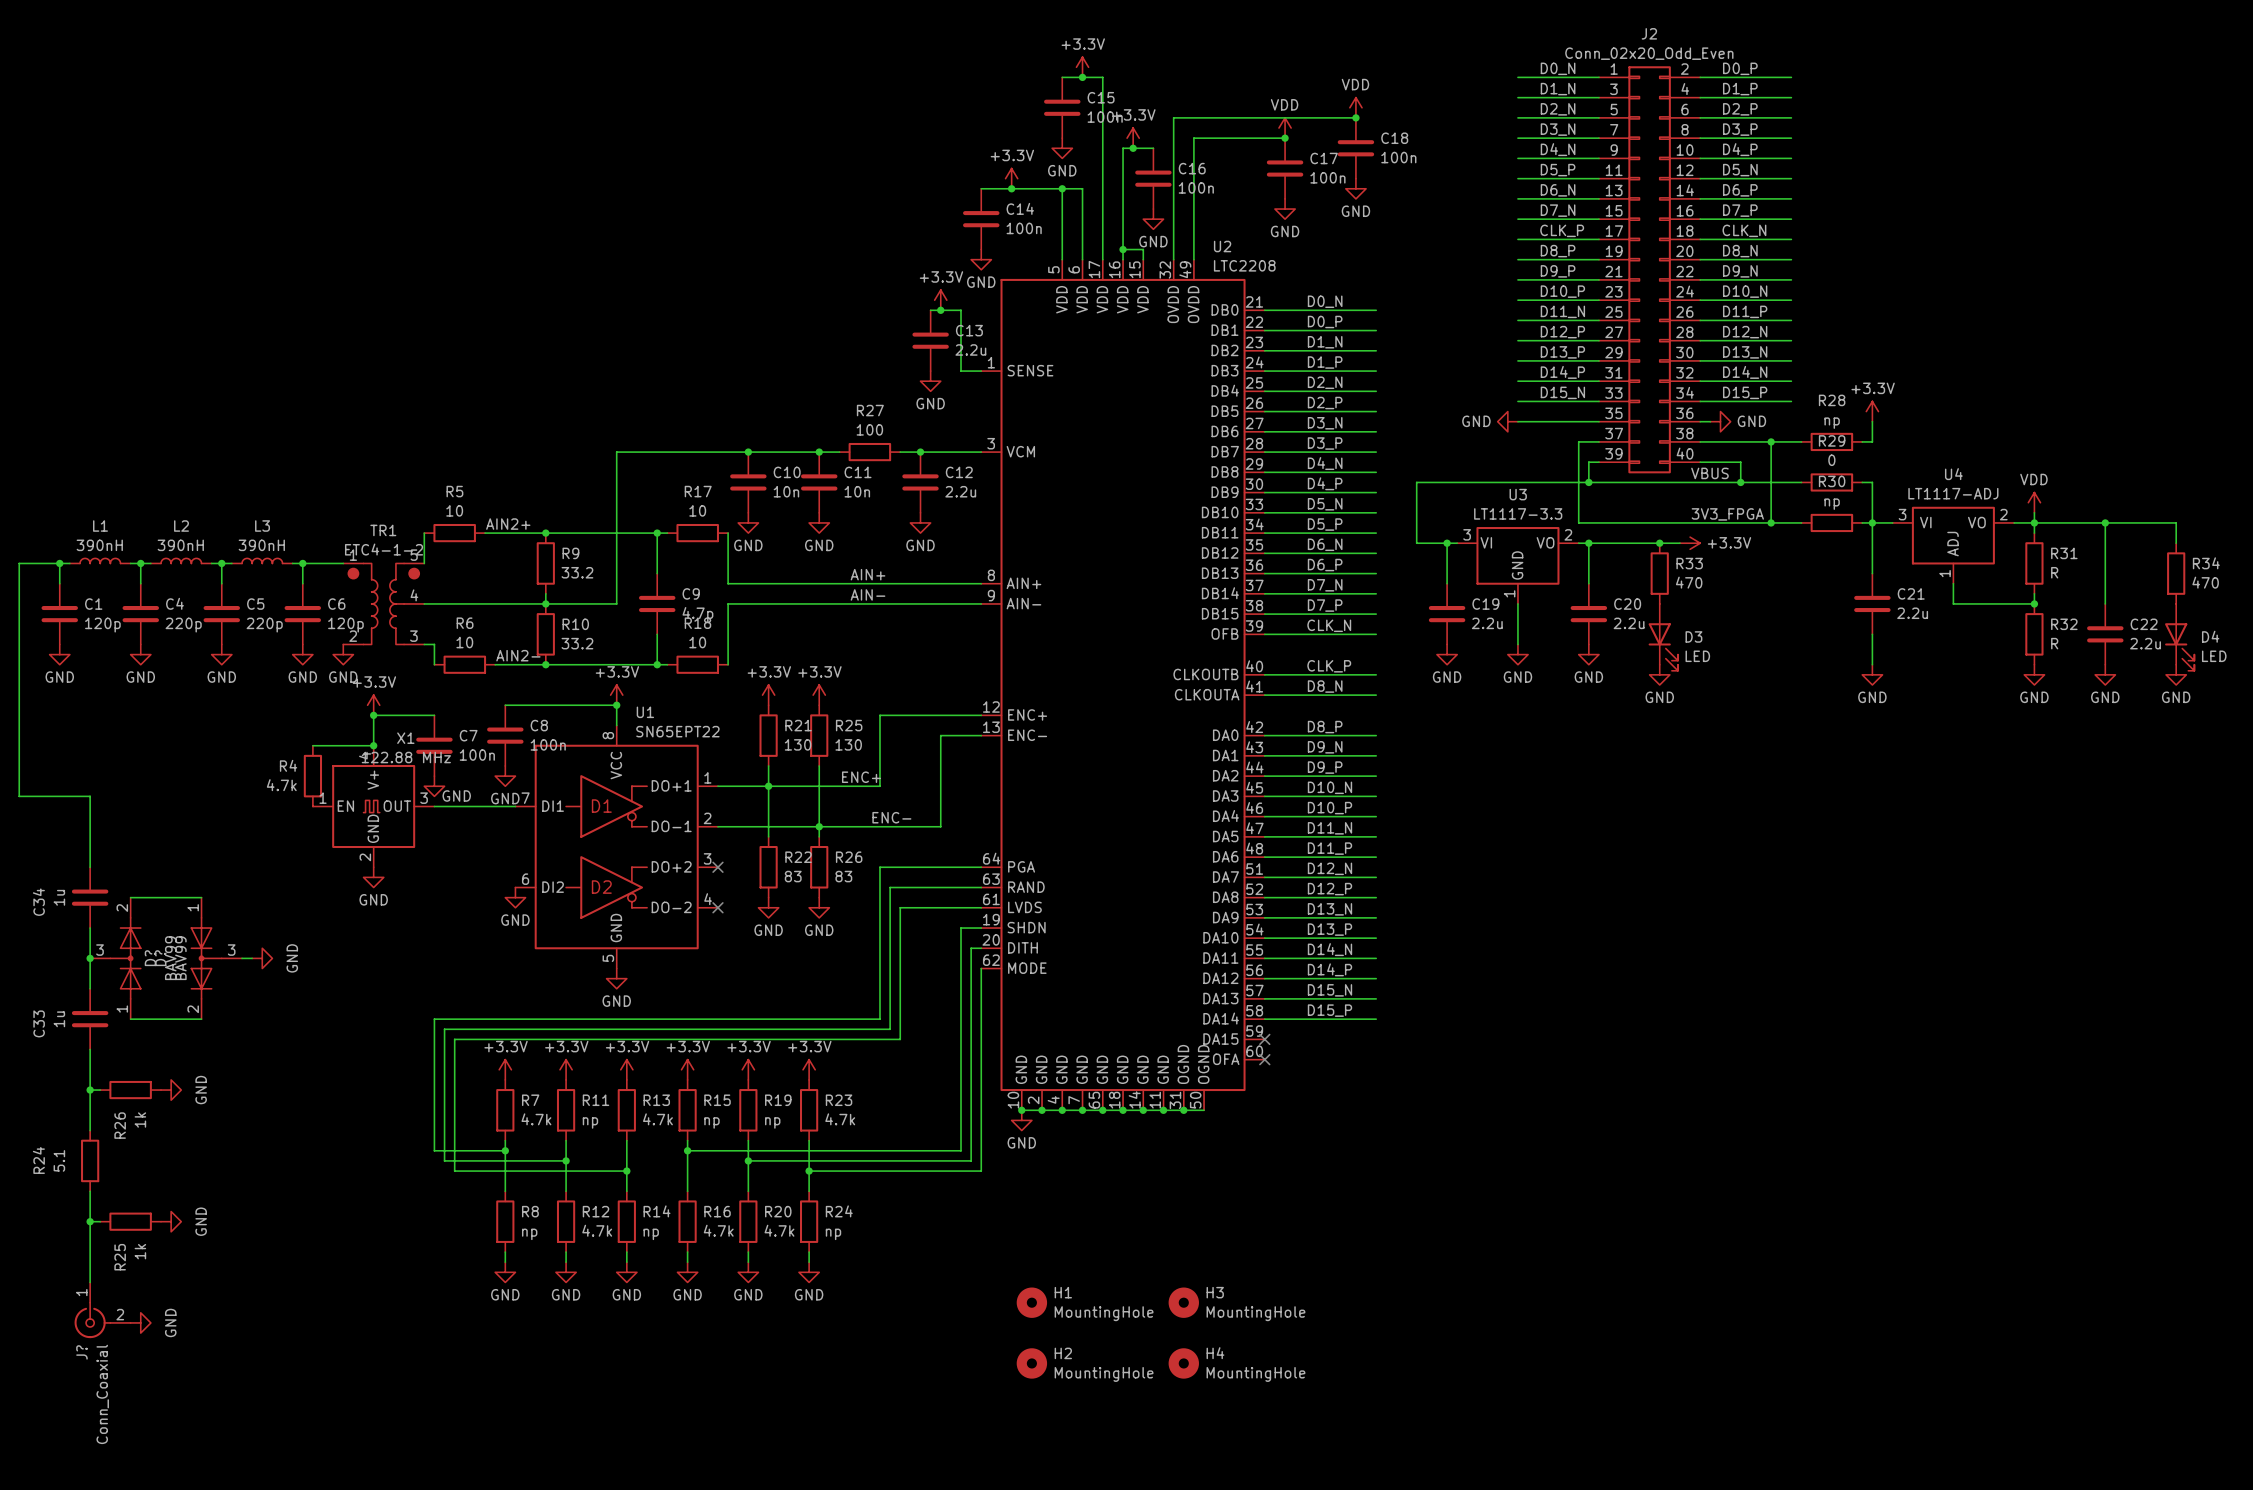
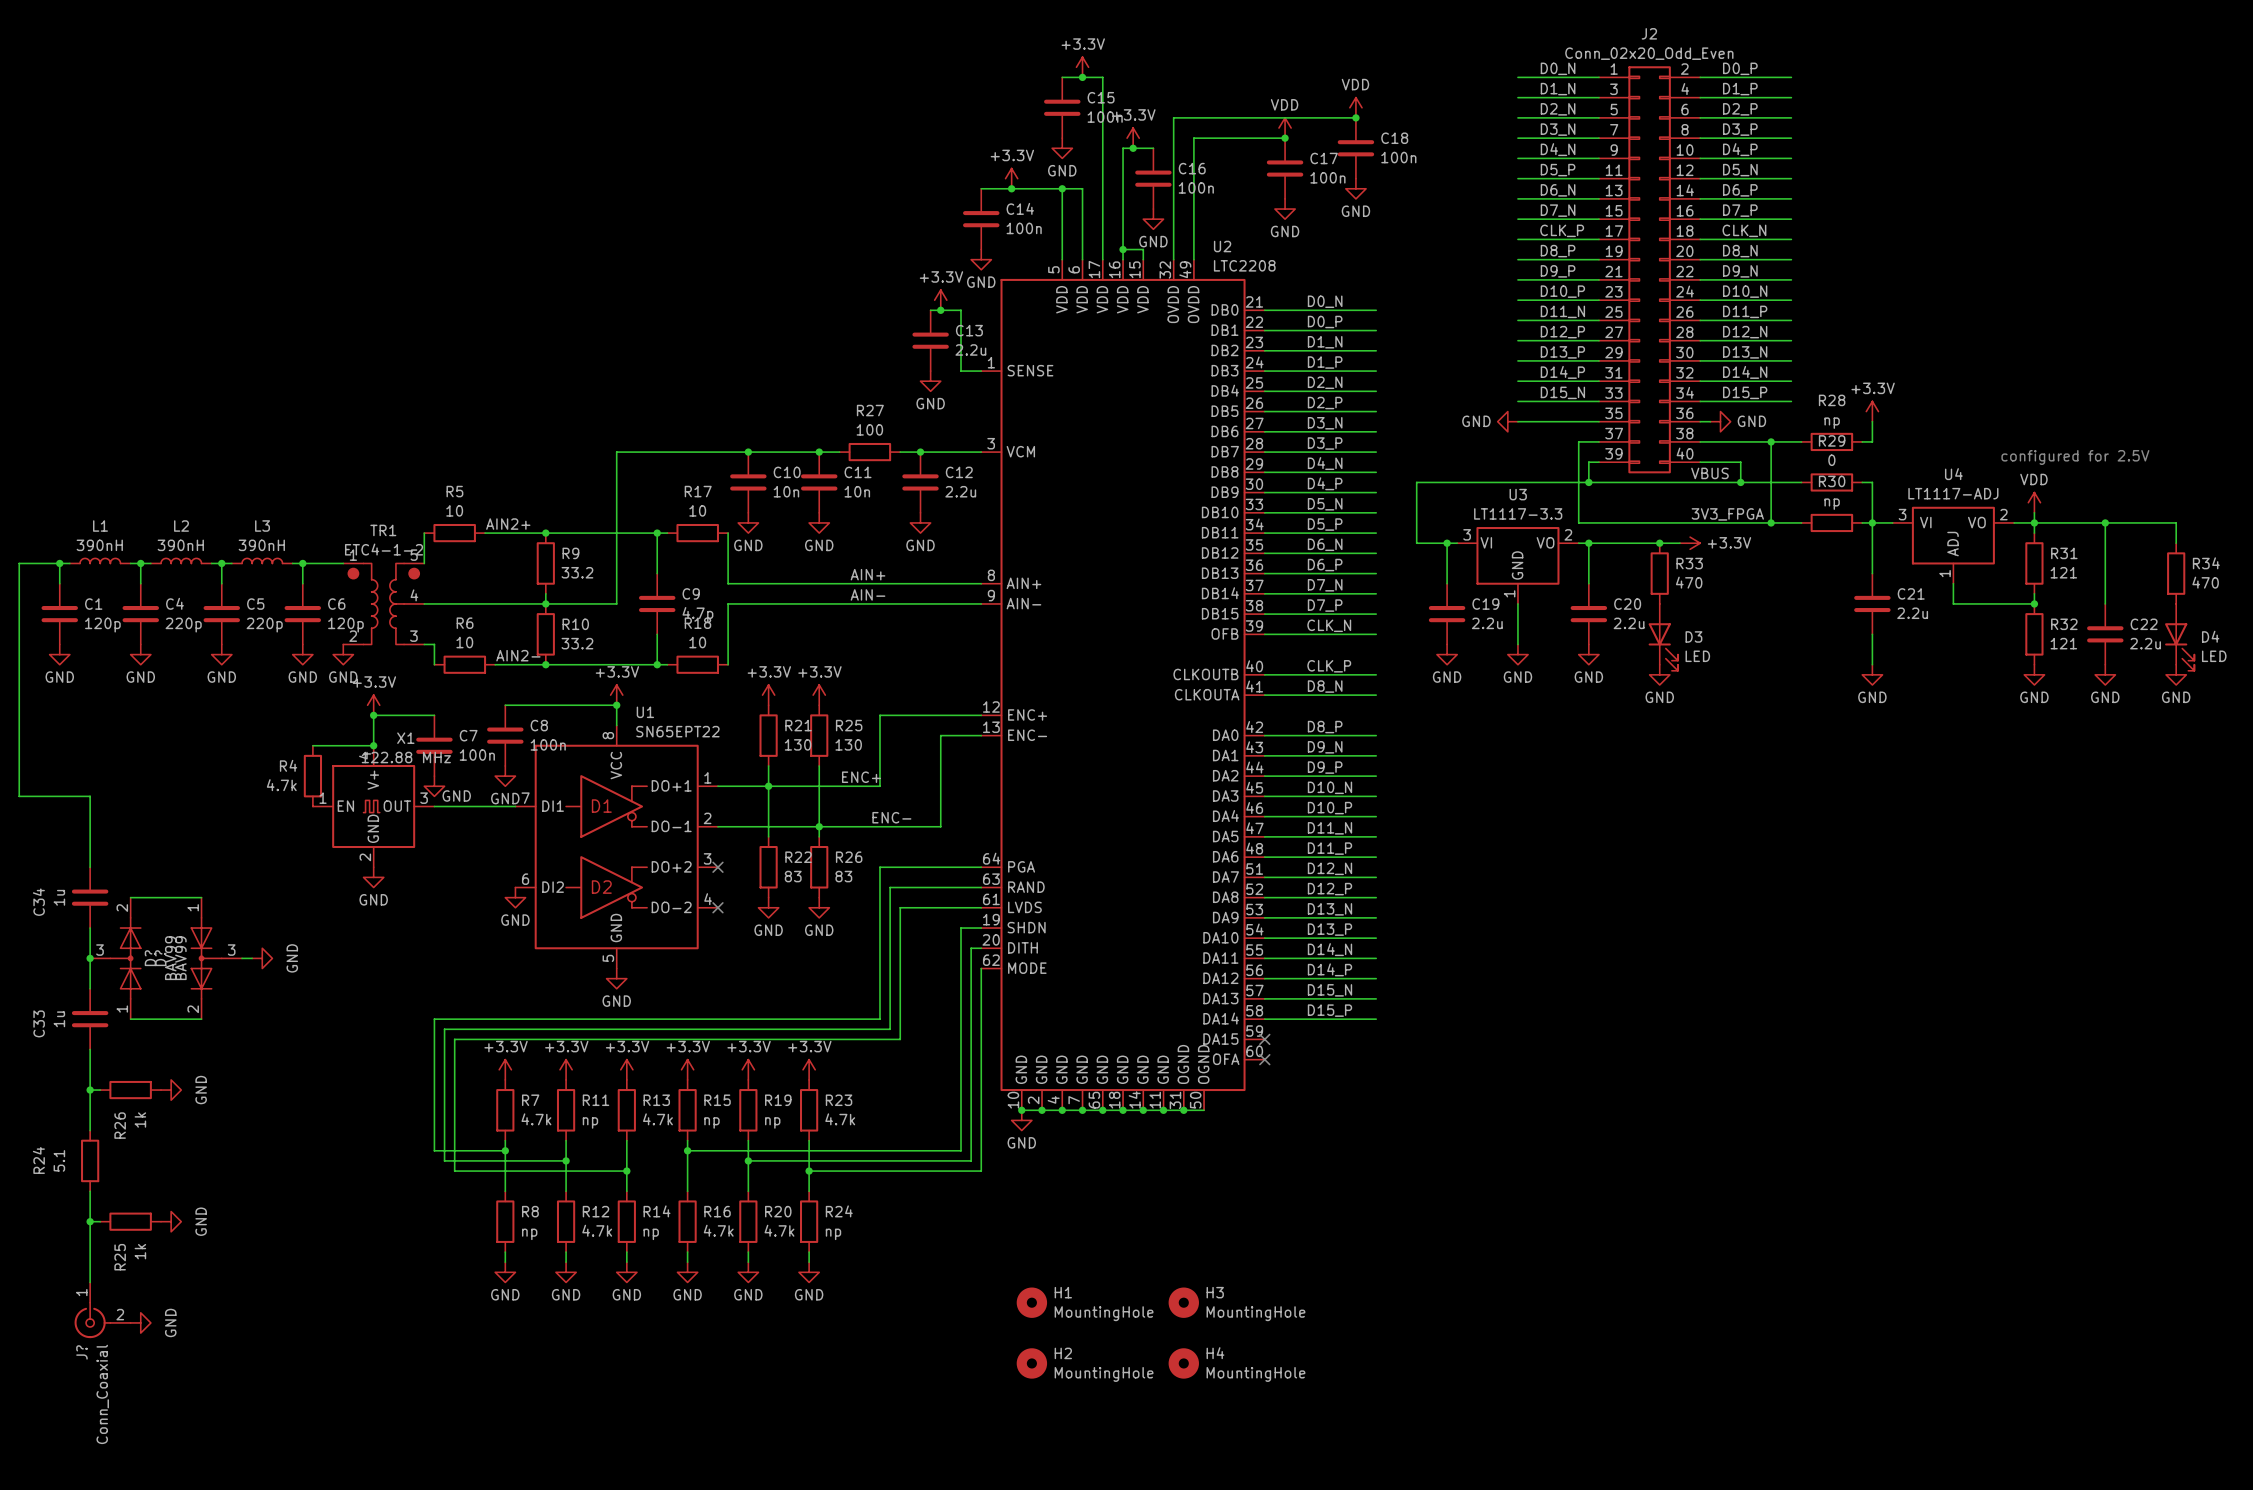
text: none -> configured for 2.5V (2075, 457)
R31 value: R (2054, 572) -> 121 (2063, 572)
R32 value: R (2054, 643) -> 121 (2063, 643)

